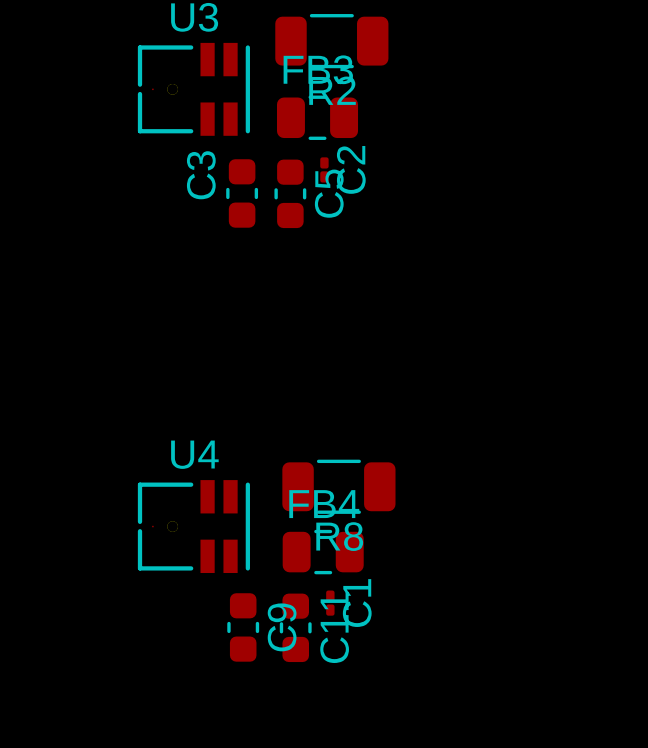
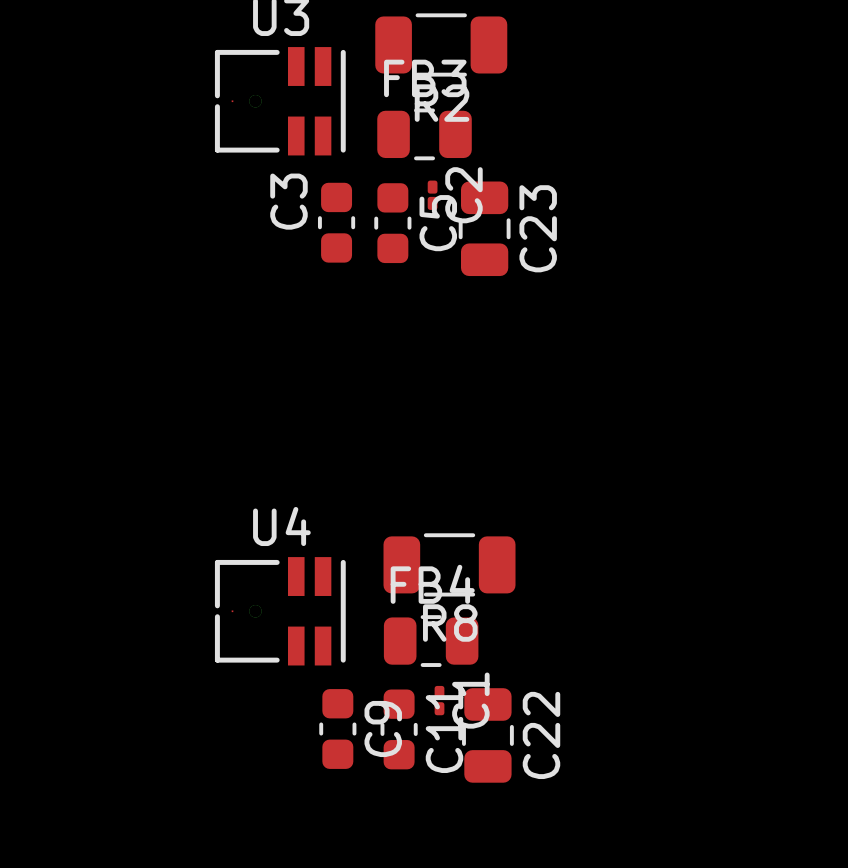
C23: none -> (484, 228)
C22: none -> (487, 735)

